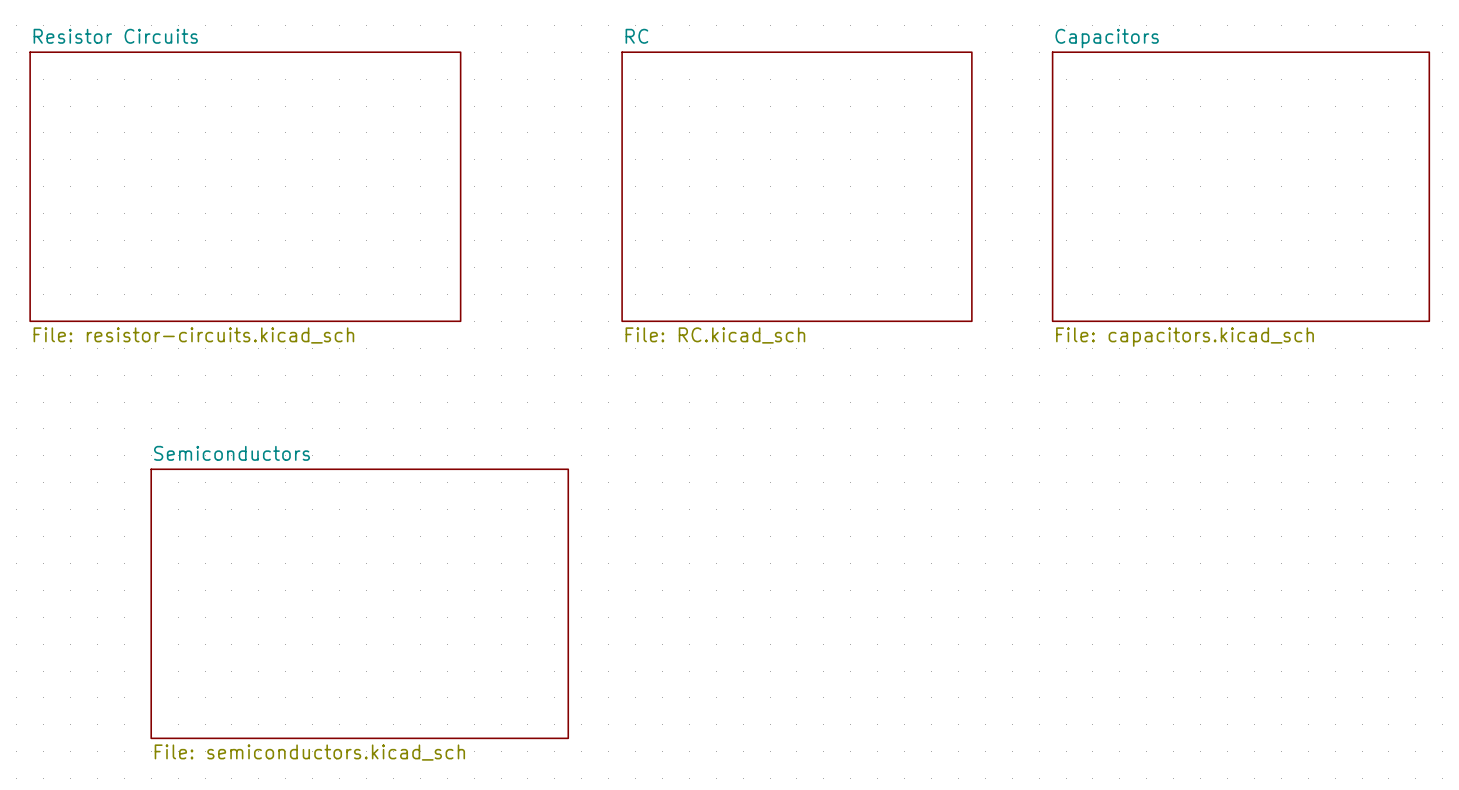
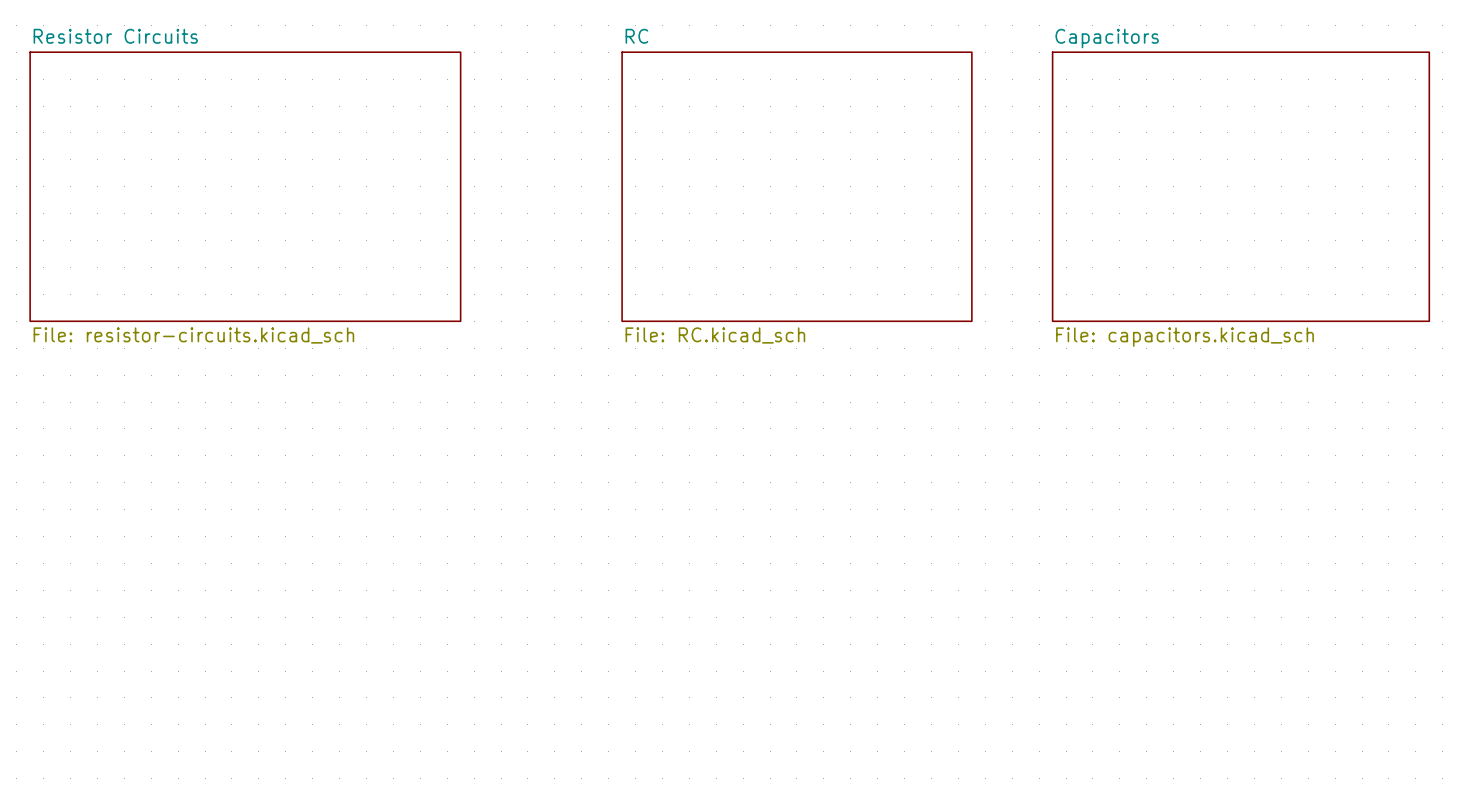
sheet Semiconductors: File: semiconductors.kicad_sch (359, 603) -> none

